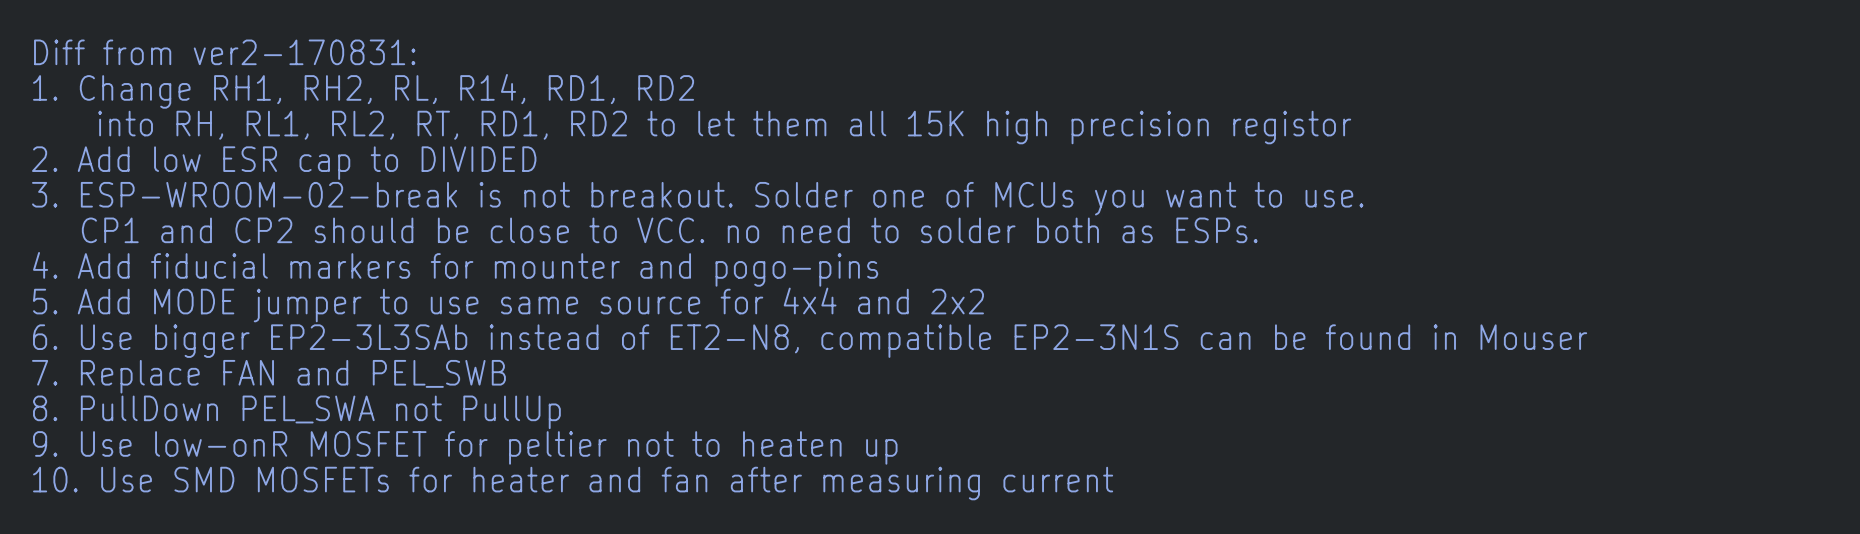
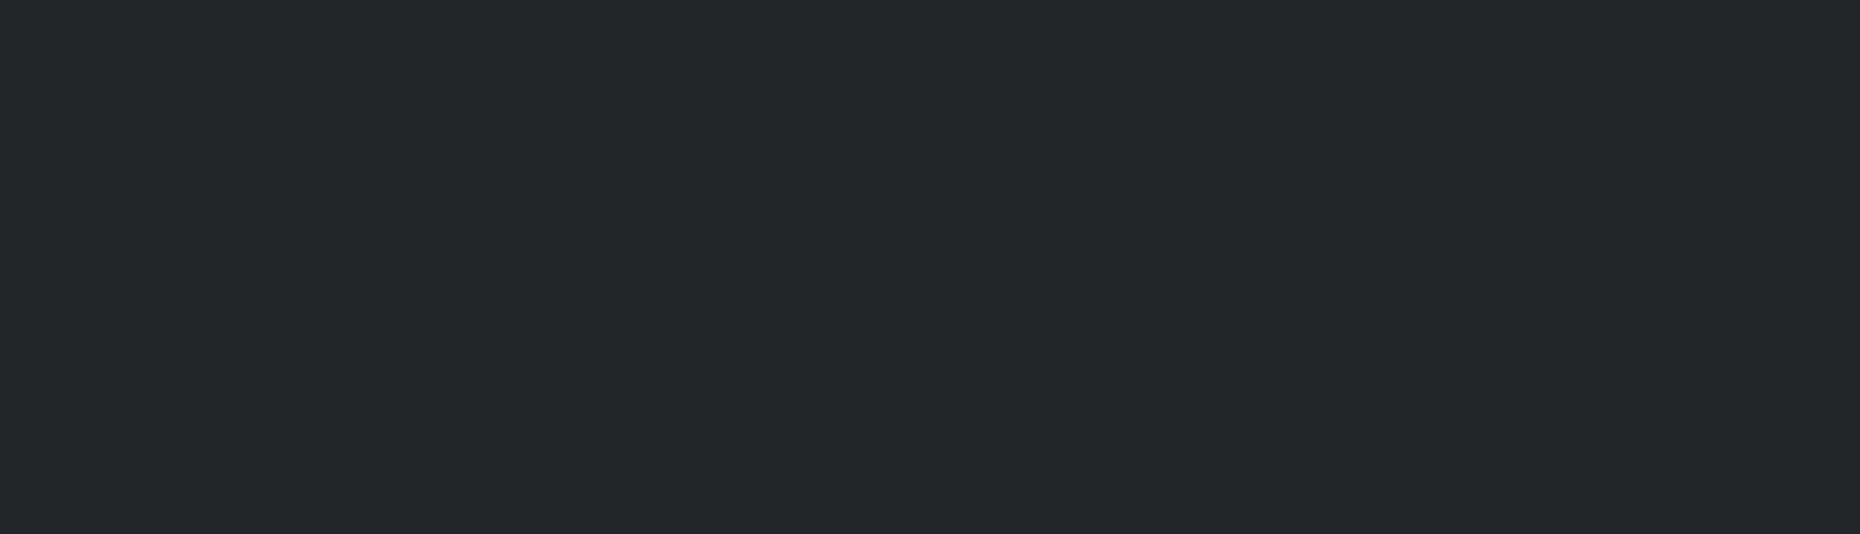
text: Diff from ver2-170831: (224, 52) -> none
text: 1. Change RH1, RH2, RL, R14, RD1, RD2 (363, 91) -> none
text: into RH, RL1, RL2, RT, RD1, RD2 to let them all 15K high precision registor (724, 127) -> none
text: 2. Add low ESR cap to DIVIDED (284, 163) -> none
text: 3. ESP-WROOM-02-break is not breakout. Solder one of MCUs you want to use. (697, 198) -> none
text: CP1 and CP2 should be close to VCC. no need to solder both as ESPs. (669, 230) -> none
text: 4. Add fiducial markers for mounter and pogo-pins (455, 269) -> none
text: 5. Add MODE jumper to use same source for 4x4 and 2x2 (508, 304) -> none
text: 6. Use bigger EP2-3L3SAb instead of ET2-N8, compatible EP2-3N1S can be found in Mouser (810, 341) -> none
text: 7. Replace FAN and PEL_SWB (268, 376) -> none
text: 8. PullDown PEL_SWA not PullUp (296, 412) -> none
text: 9. Use low-onR MOSFET for peltier not to heaten up (465, 447) -> none
text: 10. Use SMD MOSFETs for heater and fan after measuring current (573, 483) -> none

